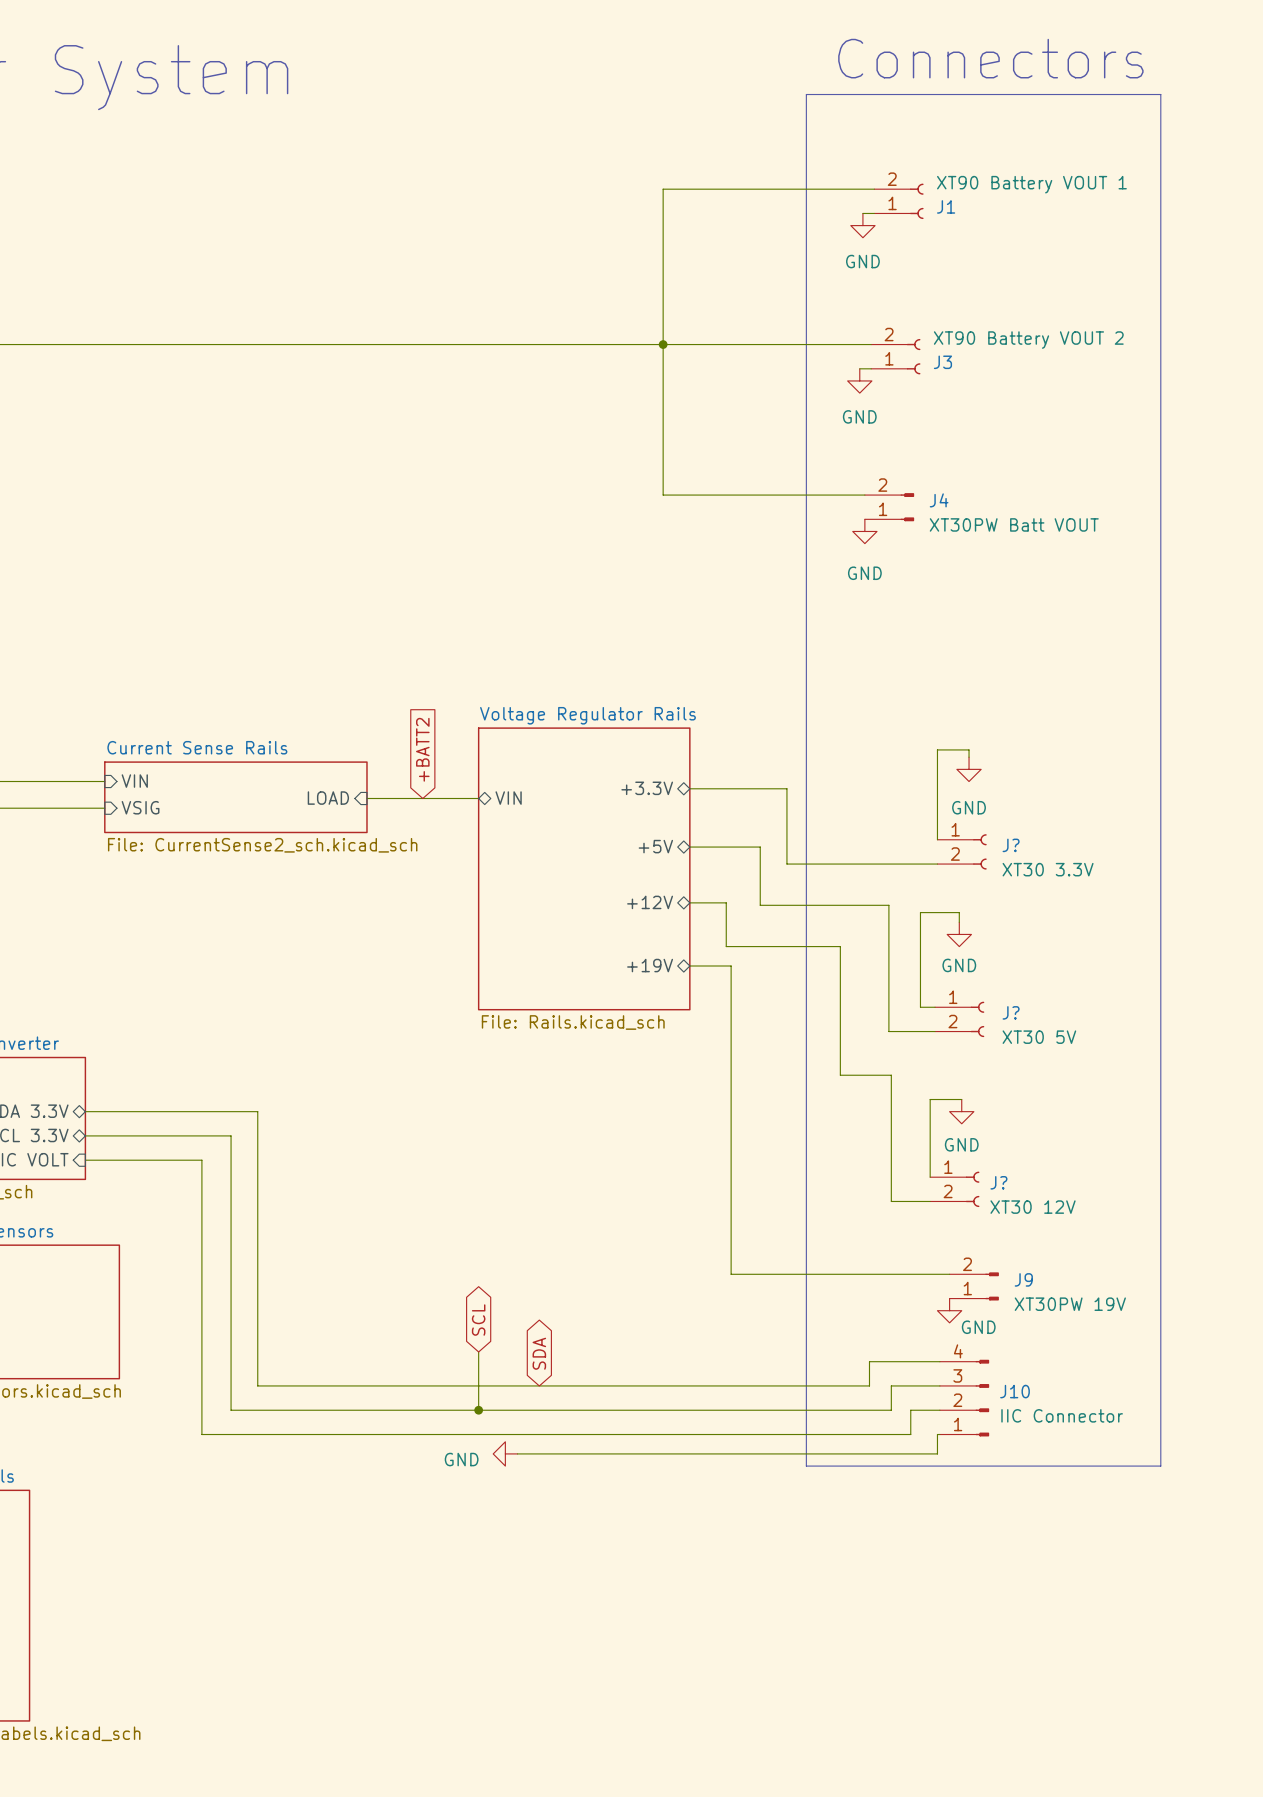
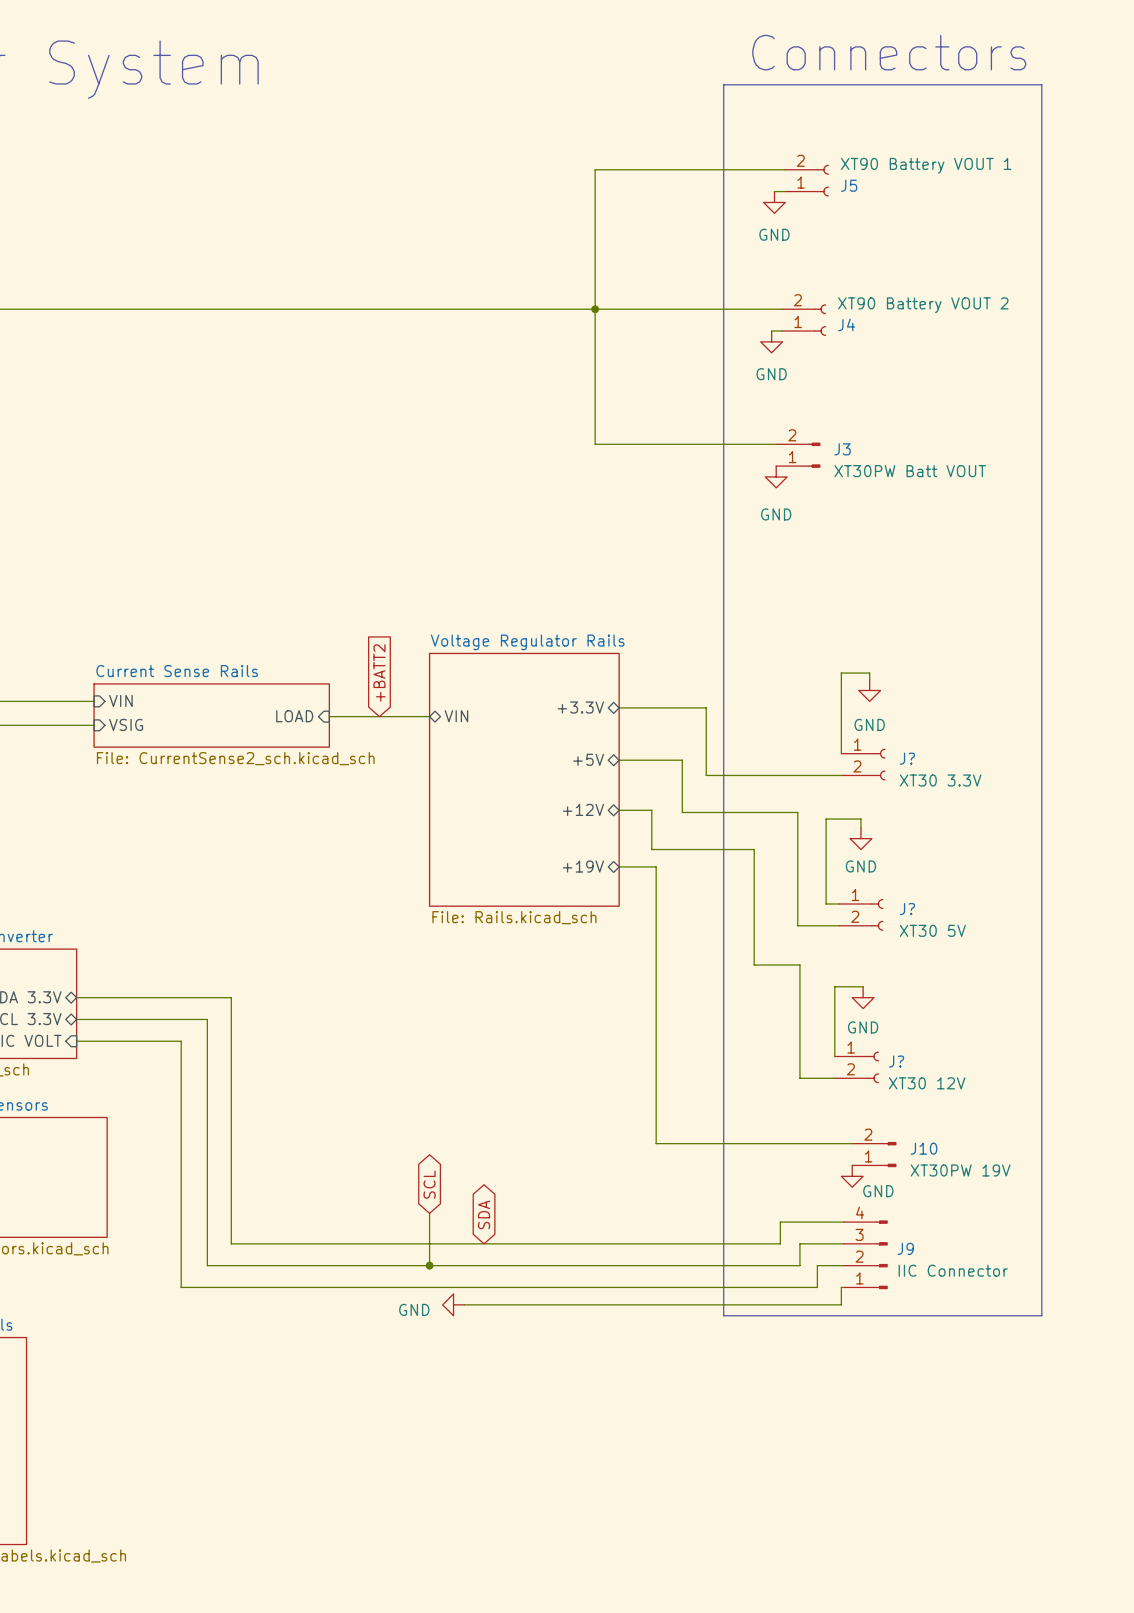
J1 name: J1 (946, 206) -> J5 (849, 185)
J3 name: J3 (942, 362) -> J4 (846, 324)
J4 name: J4 (939, 500) -> J3 (842, 449)
J9 name: J9 (1023, 1279) -> J10 (924, 1148)
J10 name: J10 (1015, 1391) -> J9 (905, 1248)

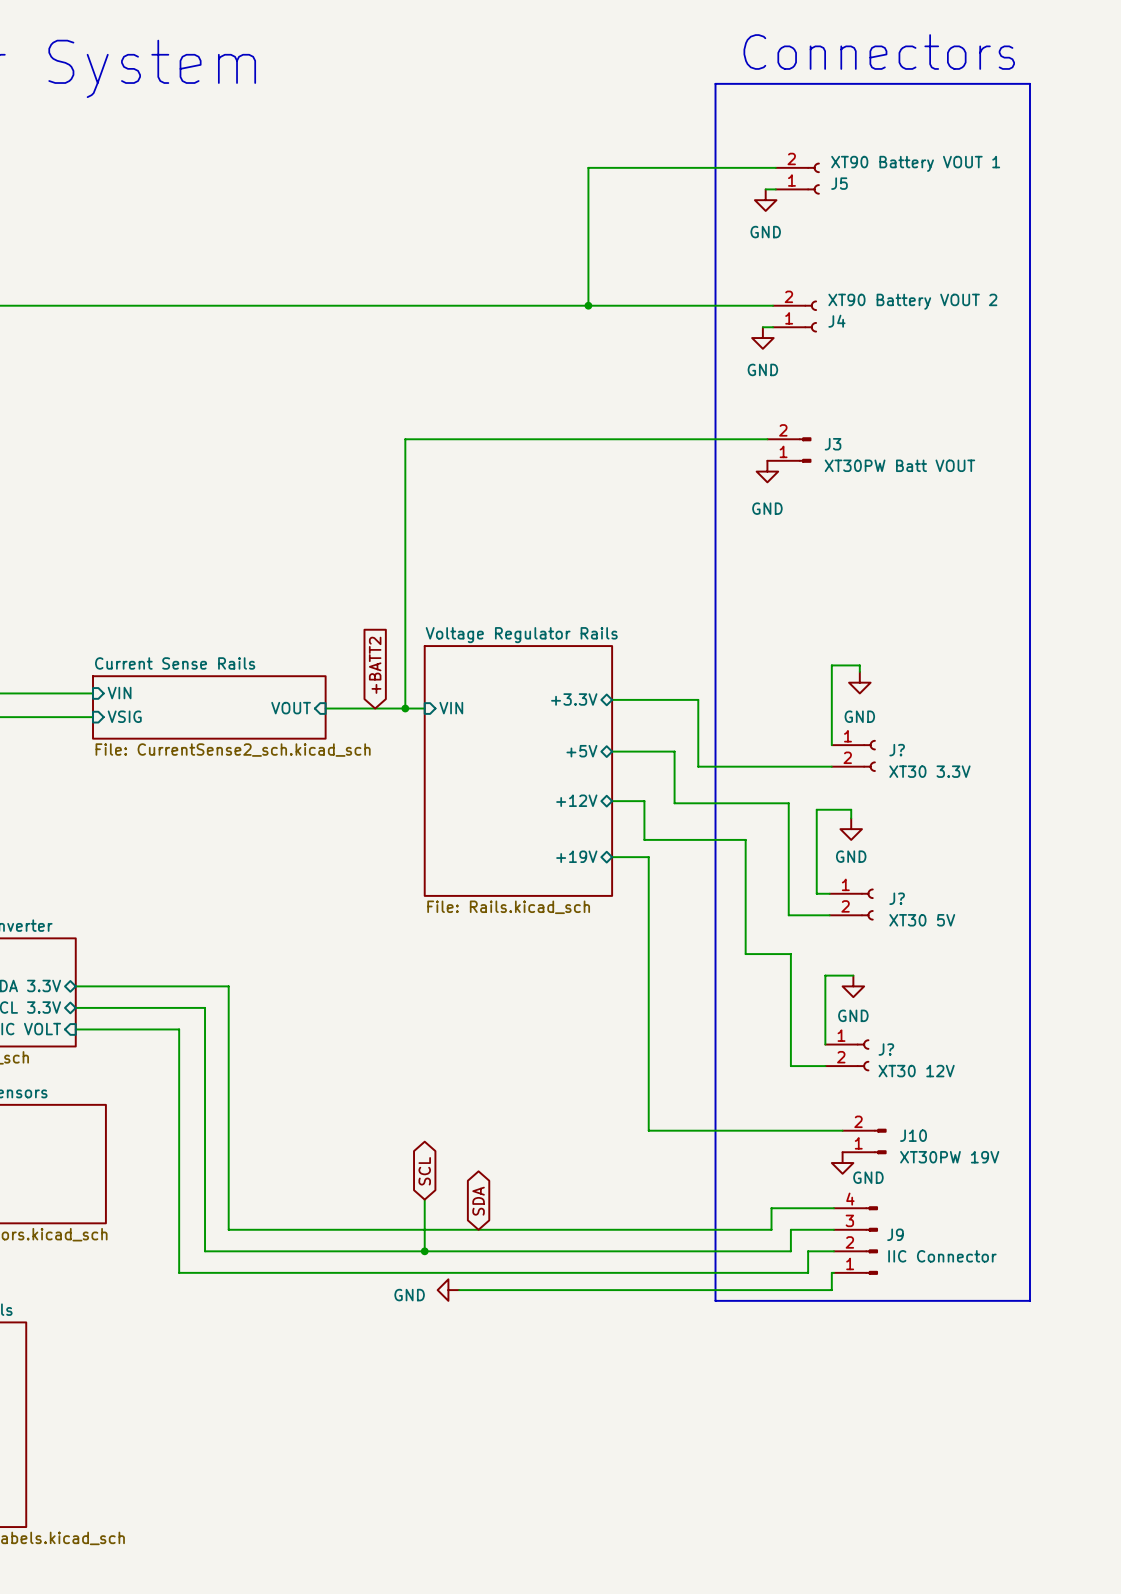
wire: (595, 309) (595, 444) -> (405, 708) (405, 439) (588, 439)
sheet pin: LOAD (294, 716) -> VOUT (291, 708)
junction: none -> (405, 708)
sheet pin shape: bidirectional (456, 716) -> input (451, 708)

